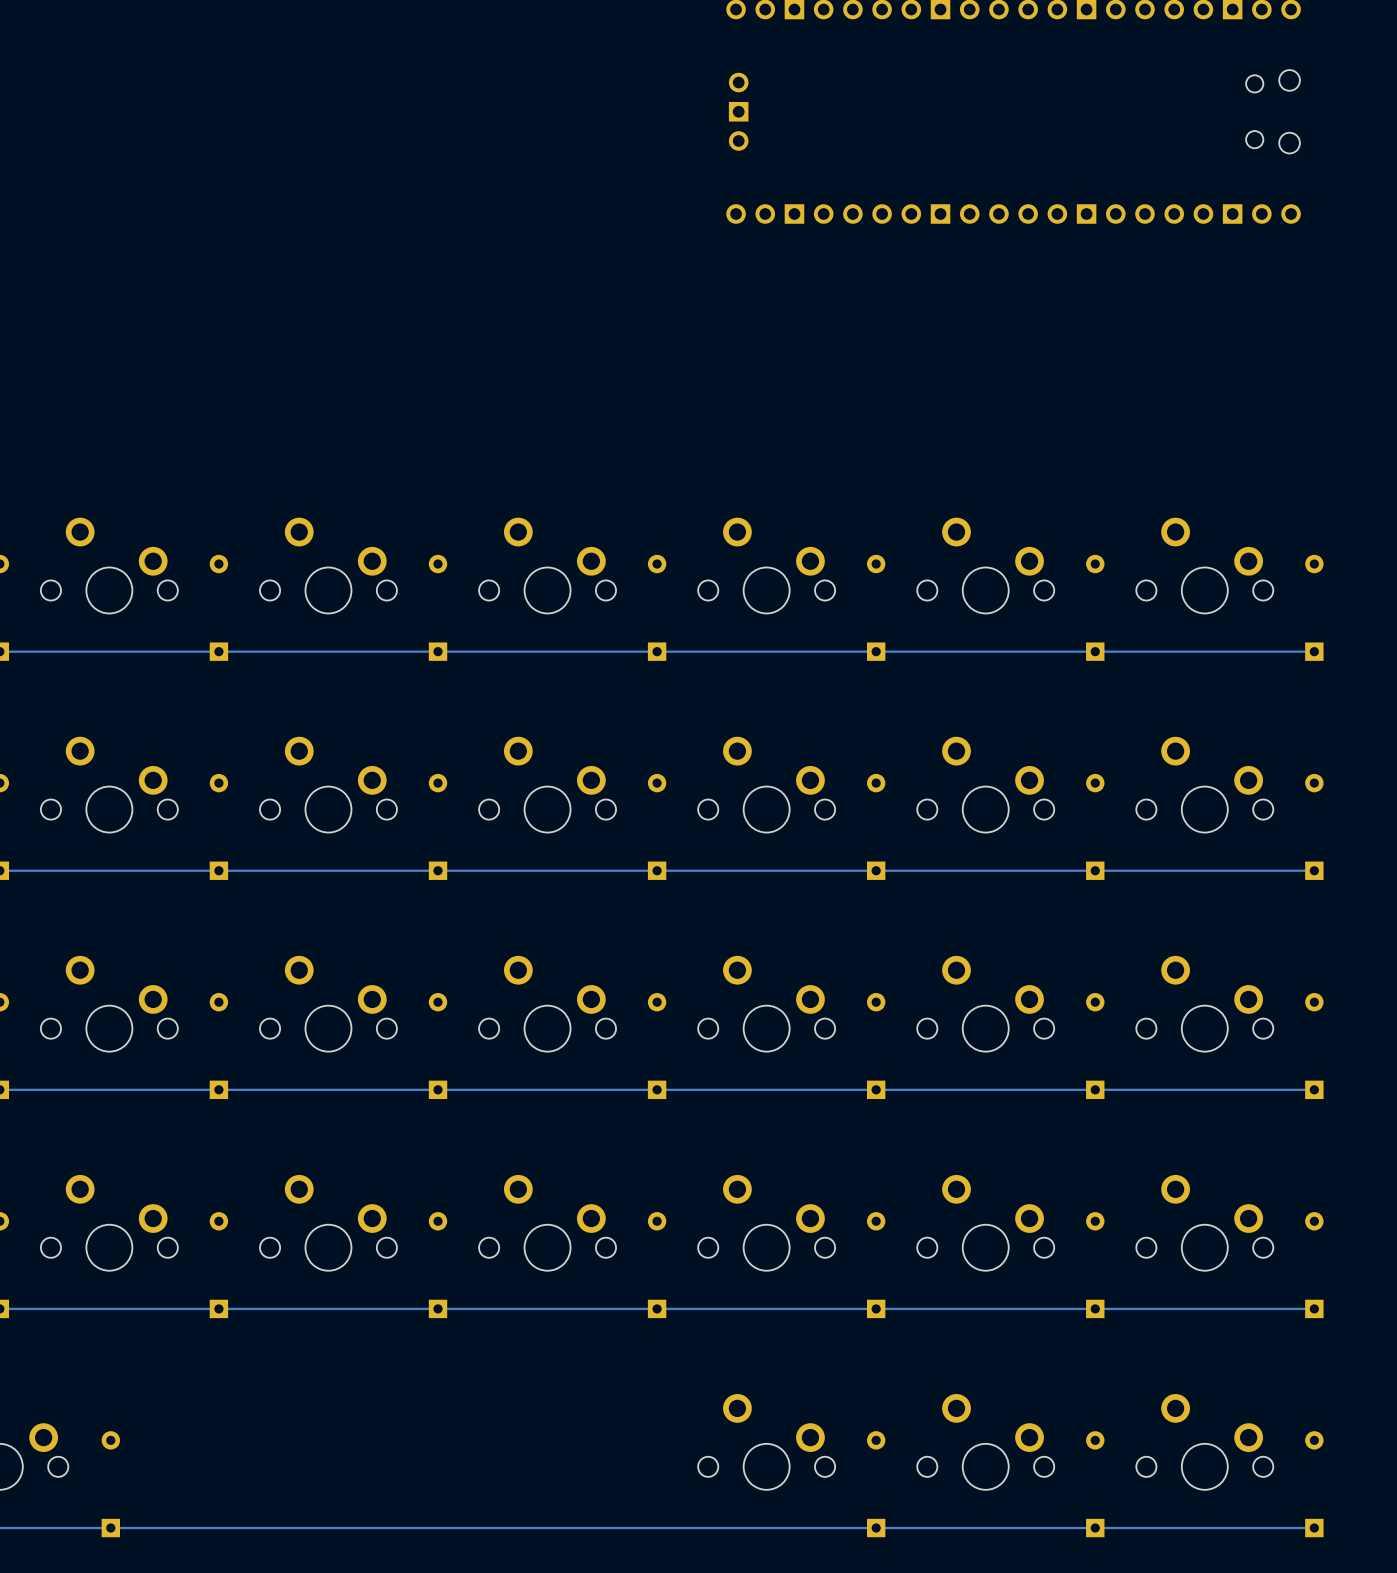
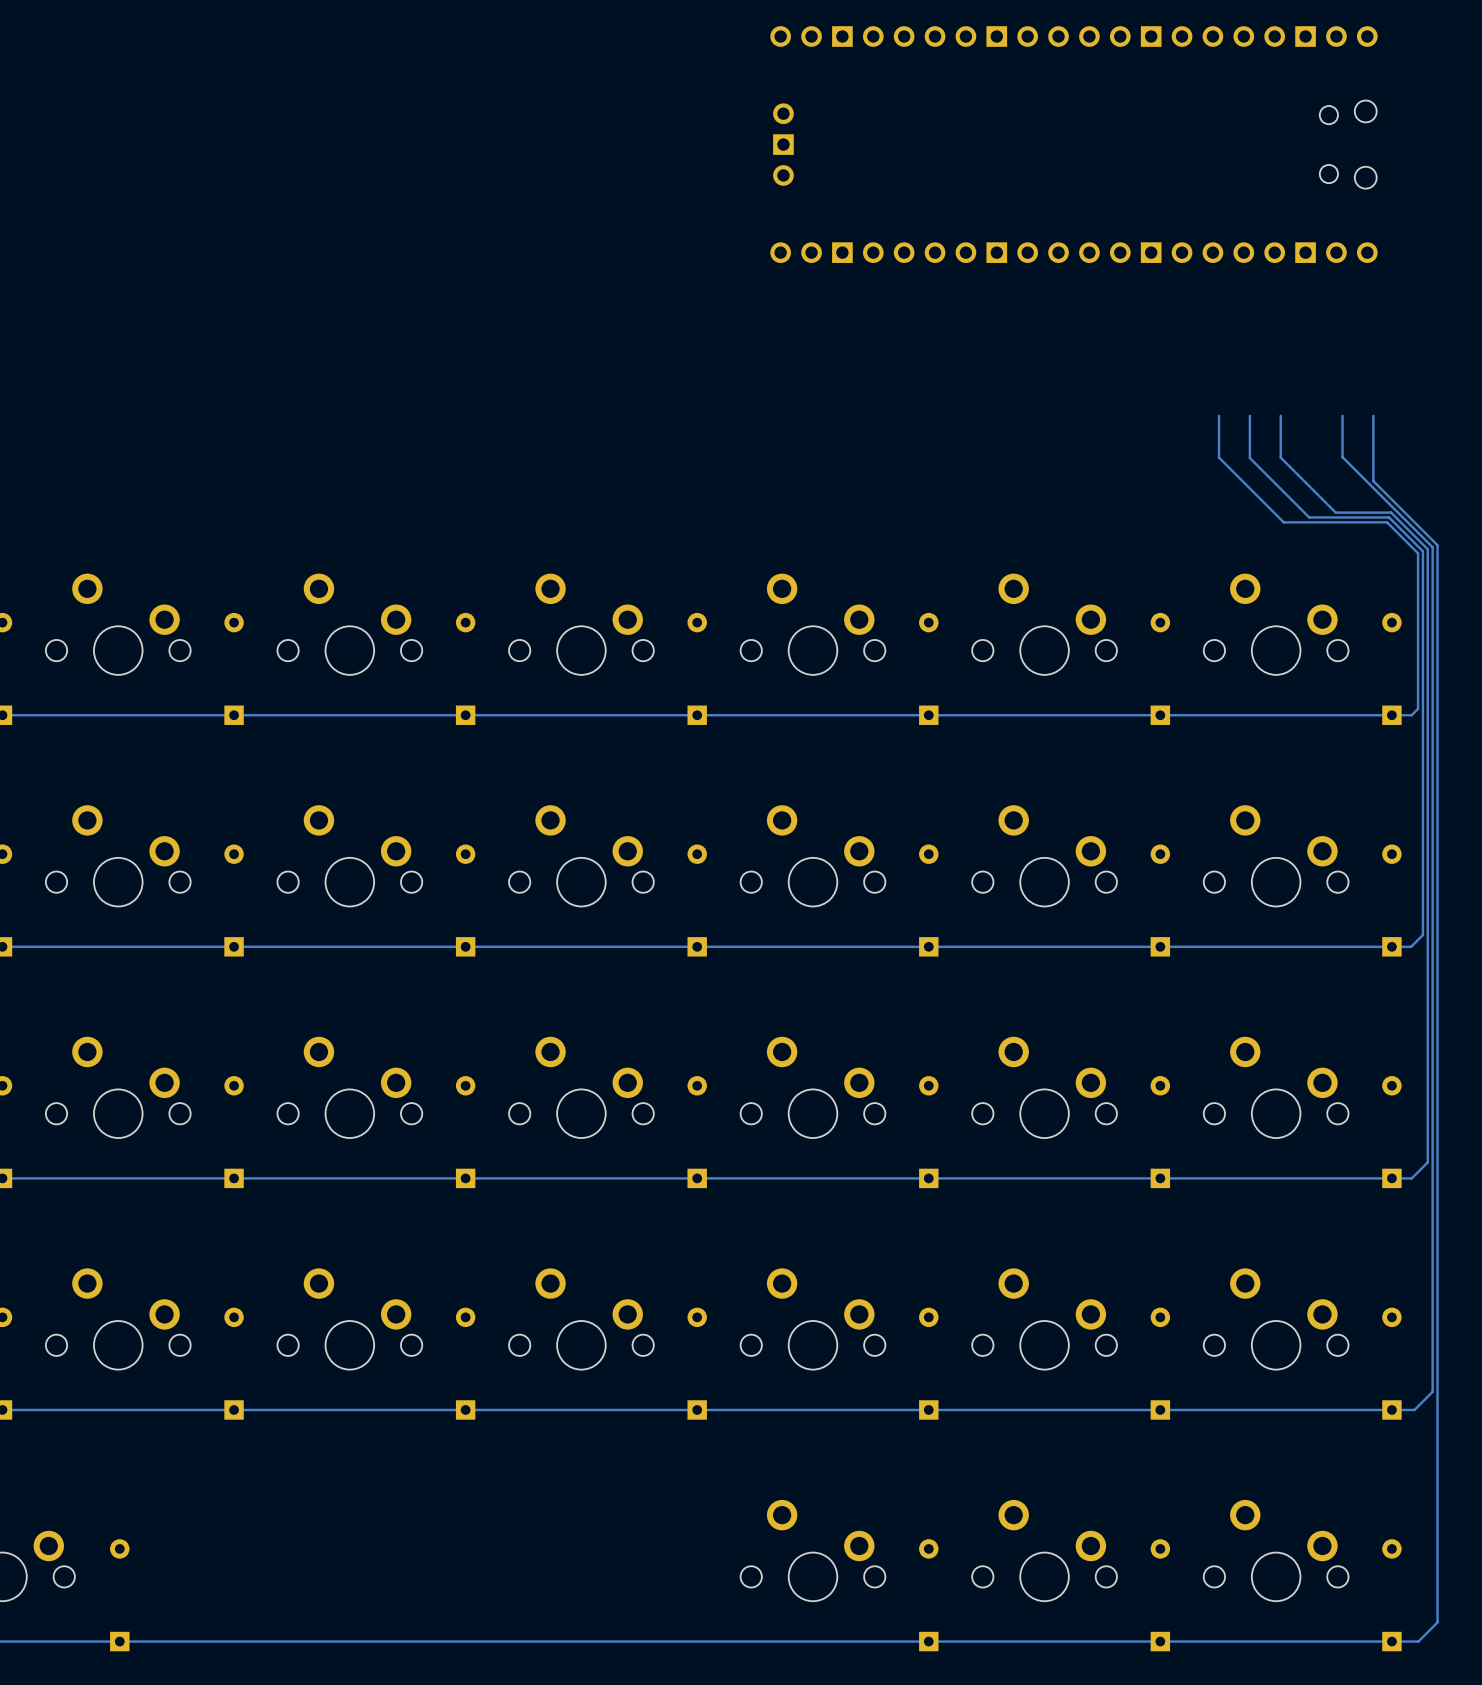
track: none -> (1219, 415) (1219, 457) (1283, 522) (1387, 522) (1418, 553) (1418, 708) (1411, 715) (1391, 715)
track: none -> (1249, 415) (1249, 458) (1309, 517) (1389, 517) (1422, 551) (1422, 935) (1411, 946) (1391, 946)
track: none -> (1280, 415) (1280, 457) (1335, 512) (1391, 512) (1427, 549) (1427, 1162) (1411, 1178) (1391, 1178)
track: none -> (1342, 415) (1342, 457) (1432, 547) (1432, 1391) (1414, 1409) (1391, 1409)
track: none -> (1373, 415) (1373, 481) (1437, 545) (1437, 1622) (1418, 1641) (1391, 1641)

